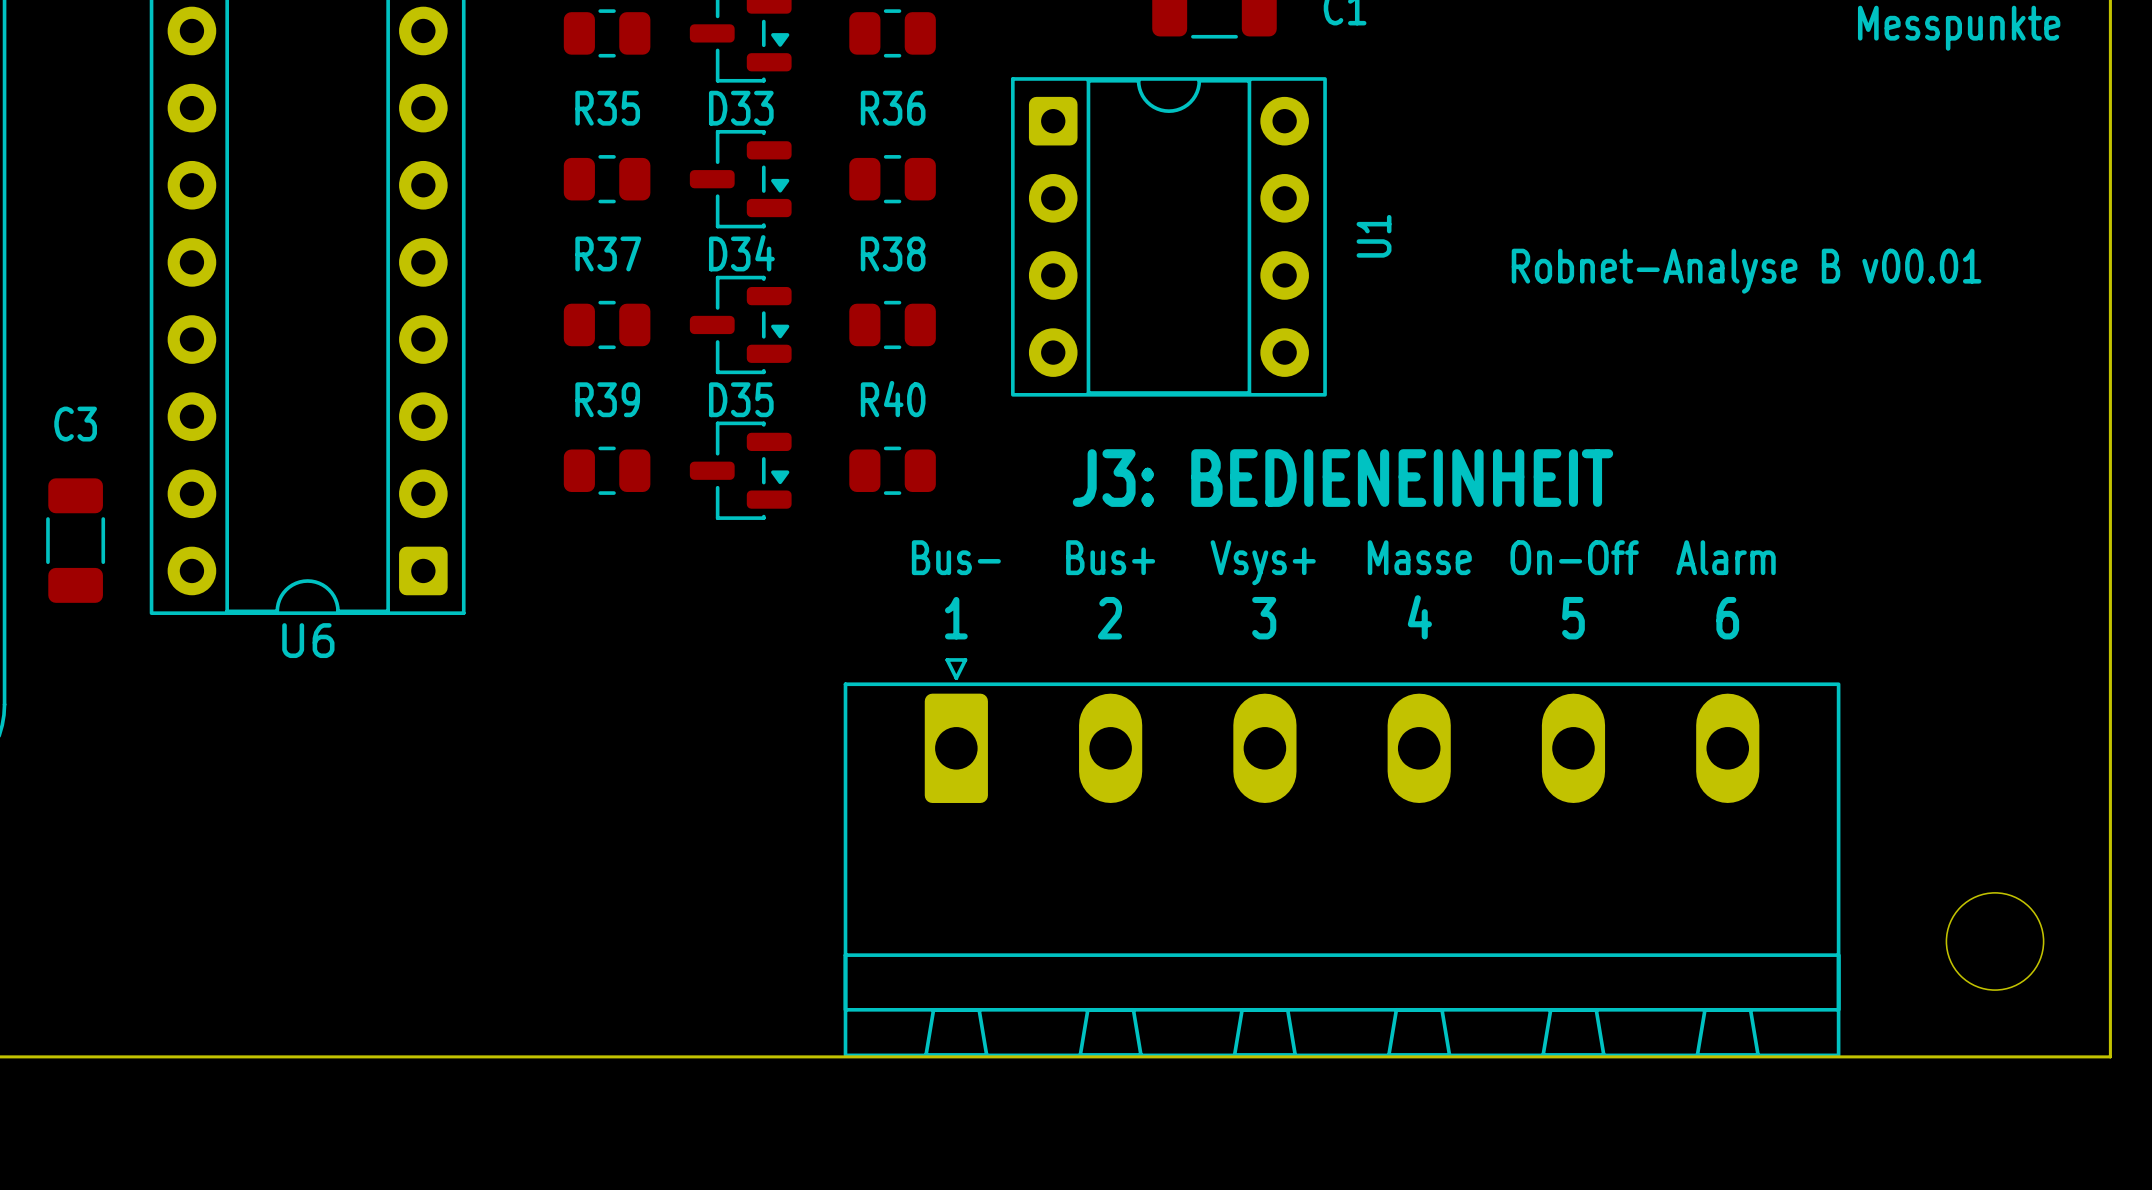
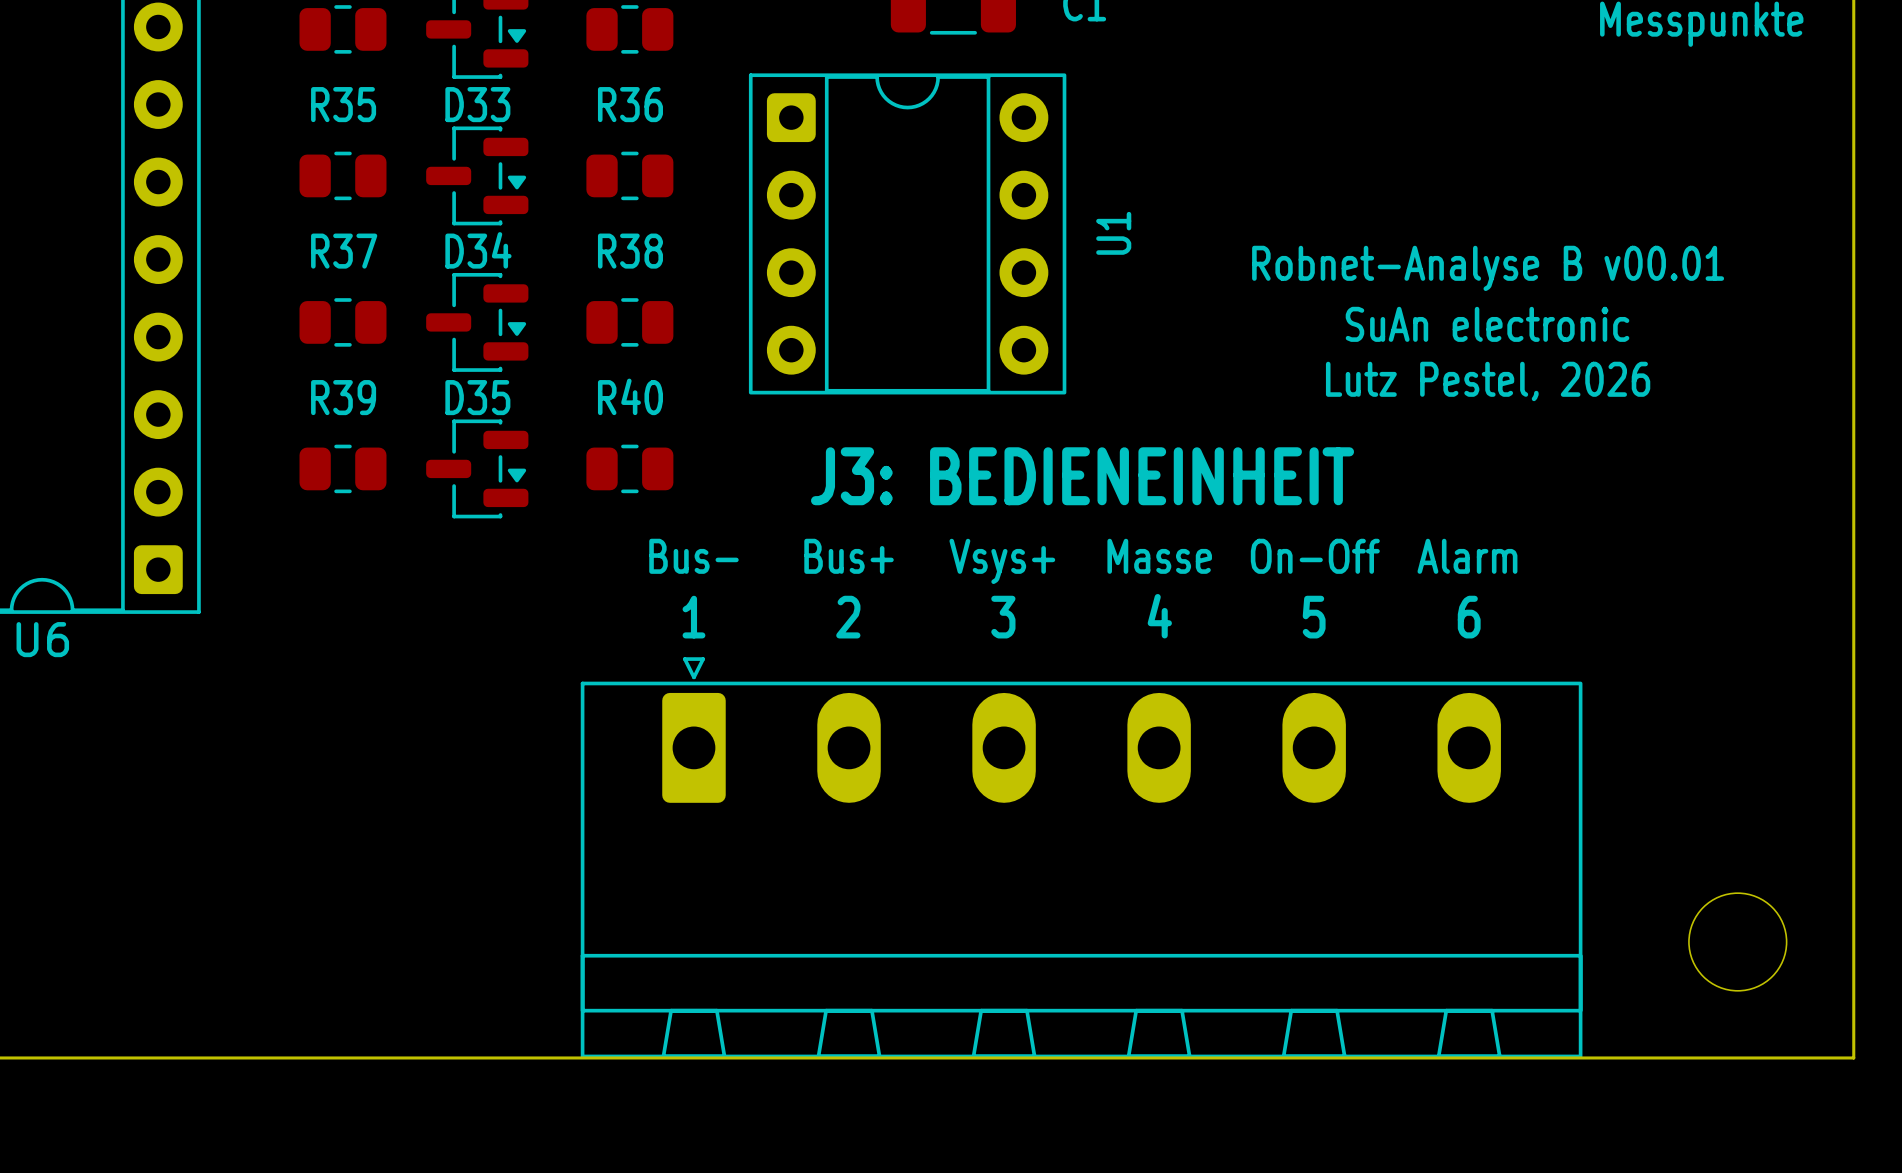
text: none -> SuAn electronic (1487, 324)
text: none -> Lutz Pestel, 2026 (1488, 381)

